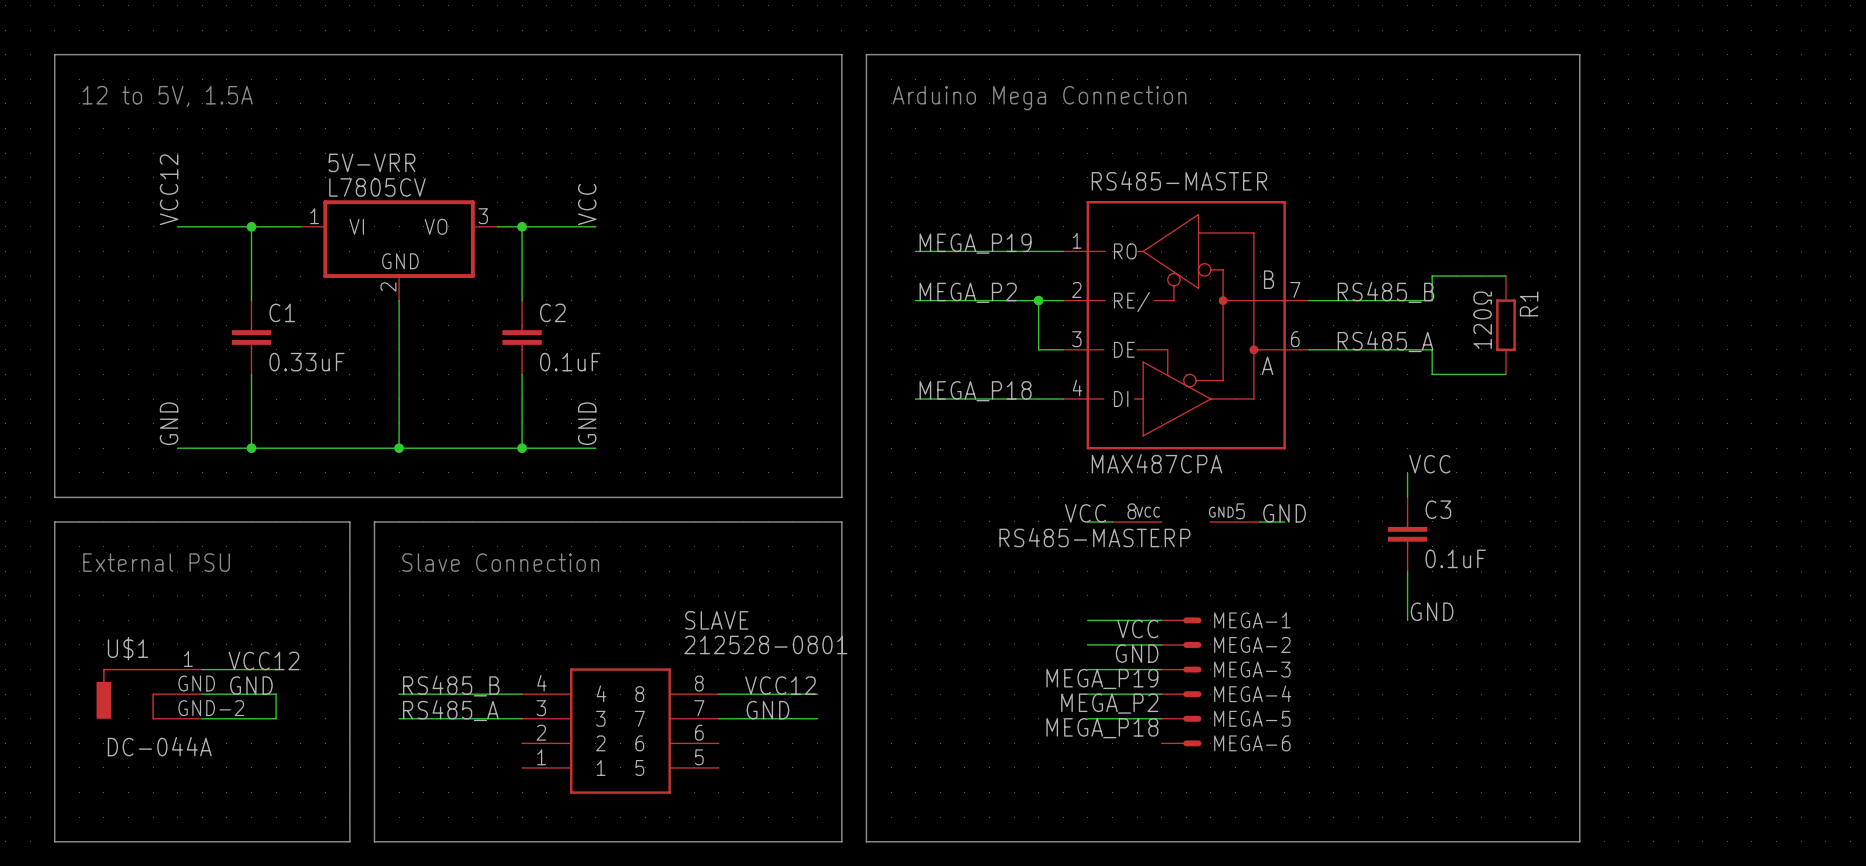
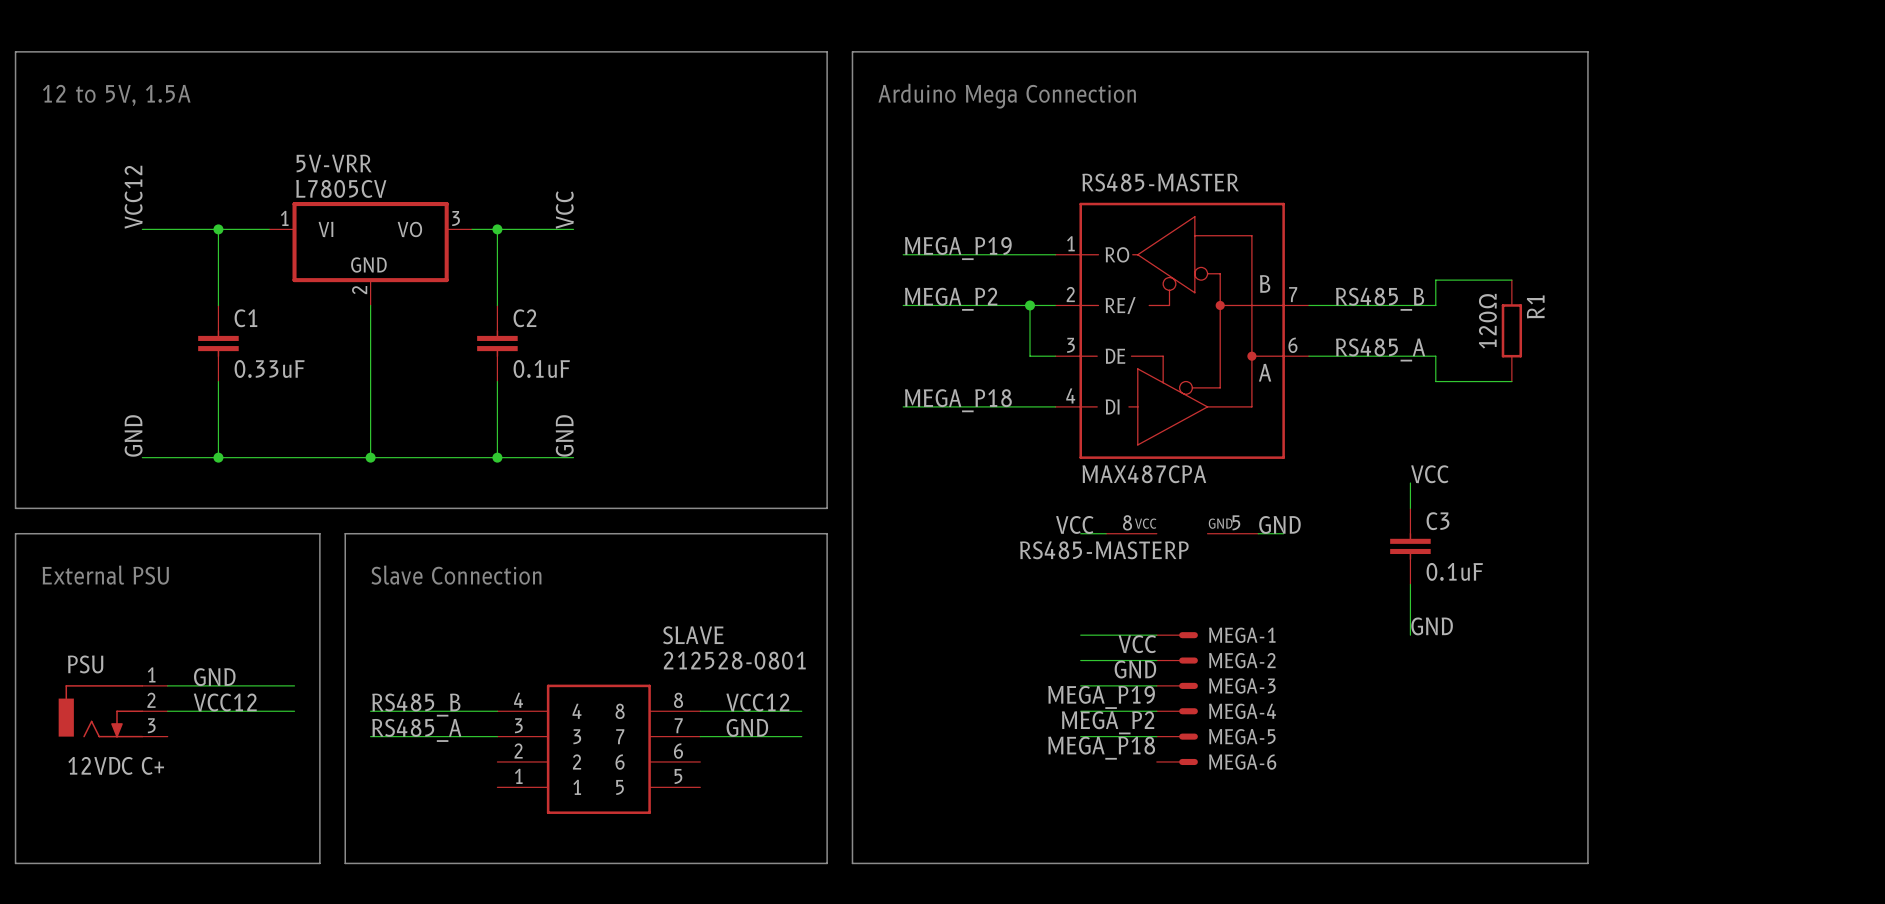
label: VCC12 (263, 660) -> GND (214, 677)
wire: none -> (243, 685) (294, 685)
label: GND (251, 685) -> VCC12 (225, 702)
U$1: DC-044A (149, 694) -> none
PSU: none -> 12VDC C+ (113, 711)
wire: (276, 694) (276, 718) (202, 718) -> (243, 711) (294, 711)

